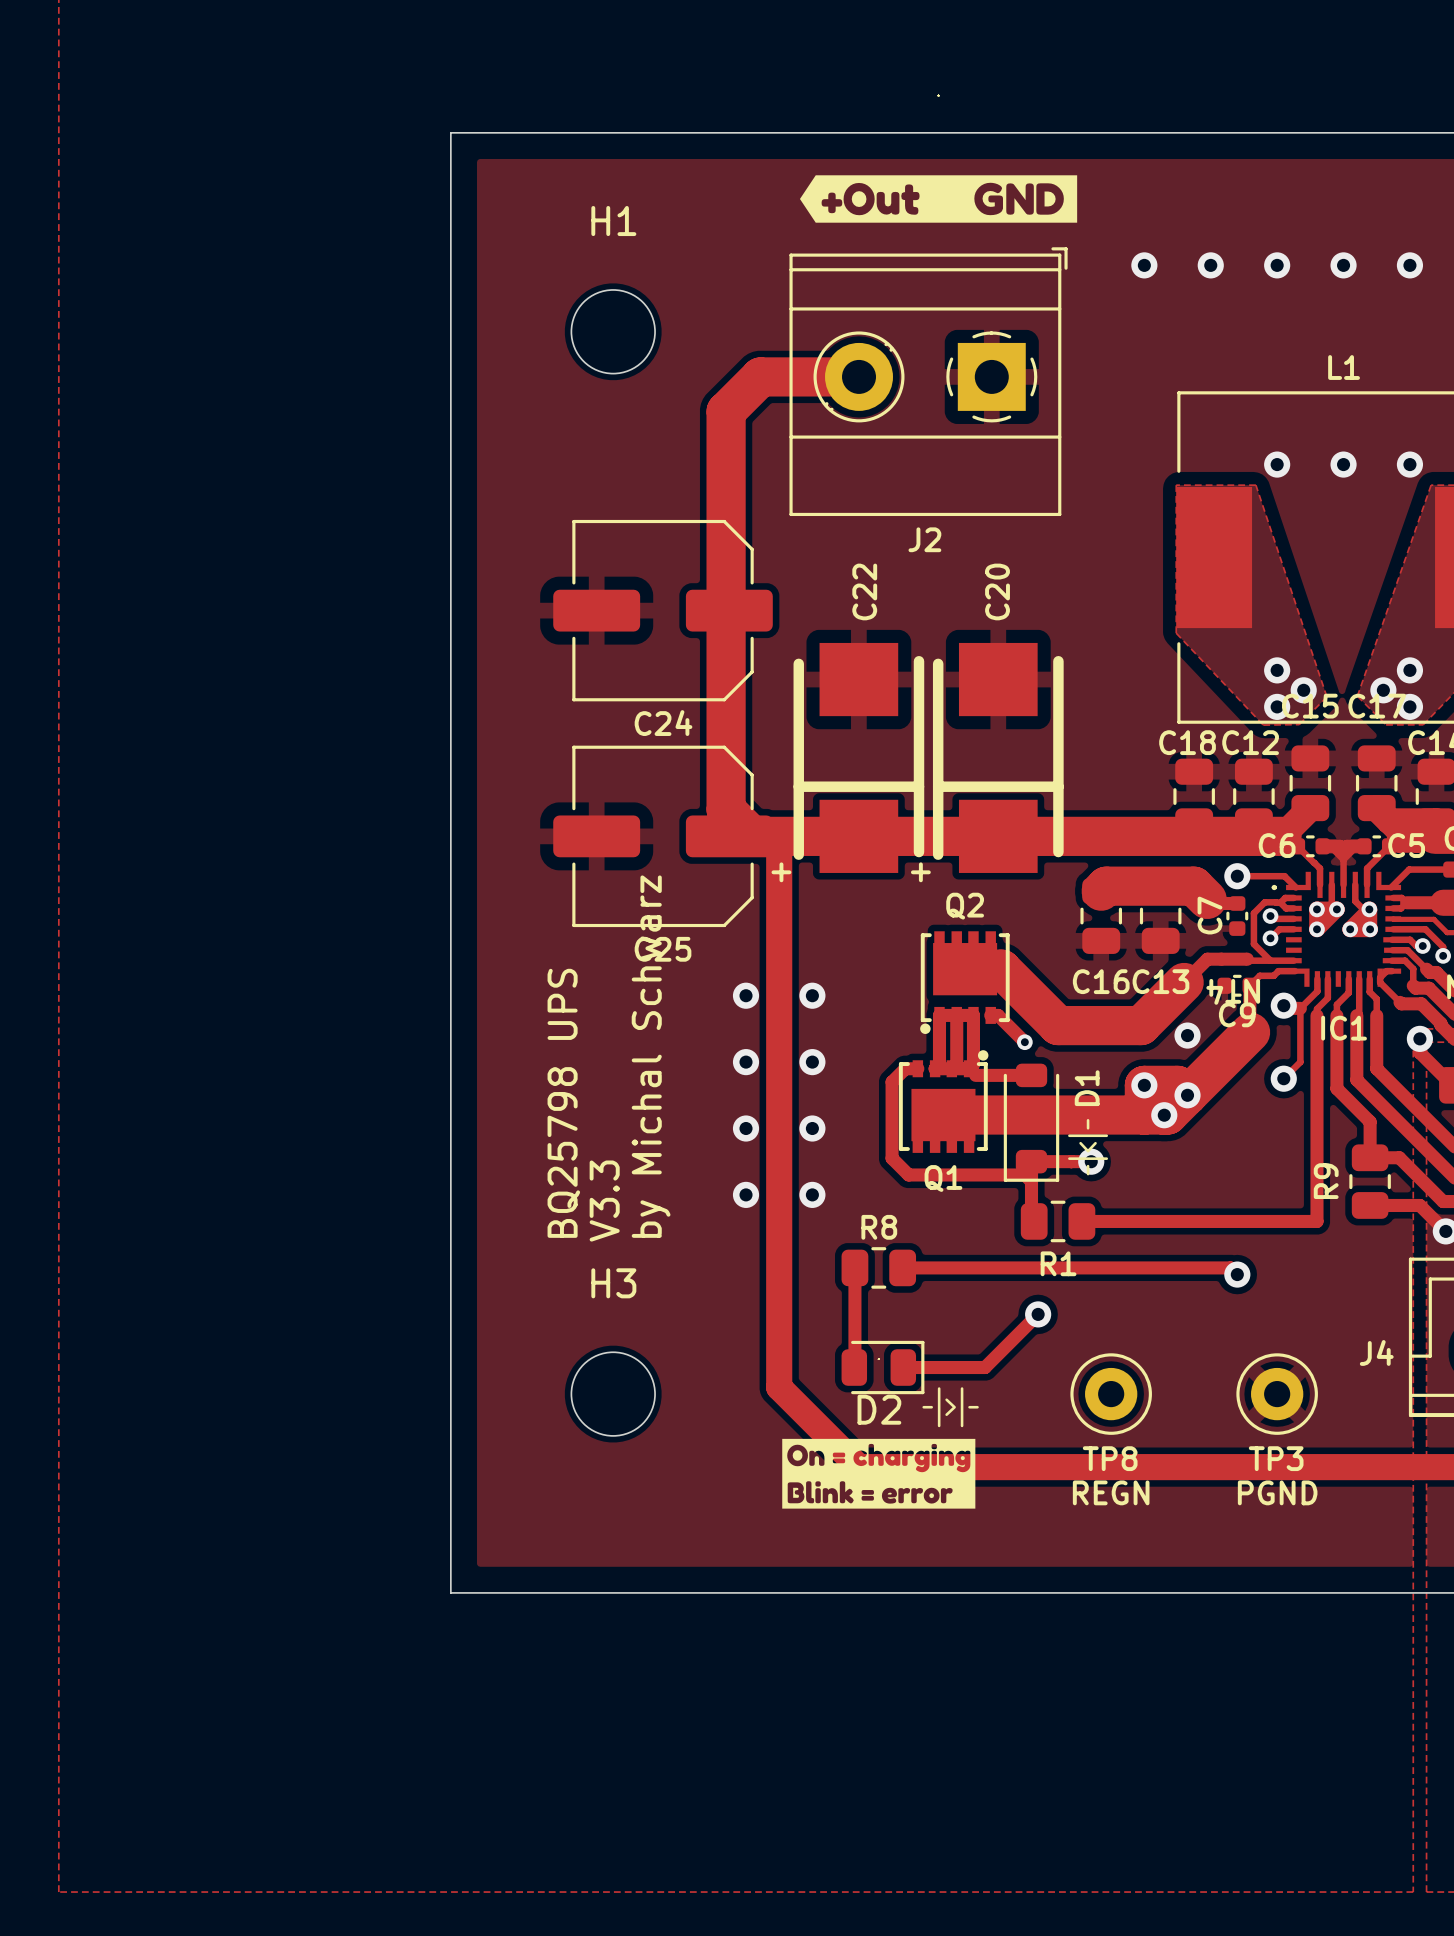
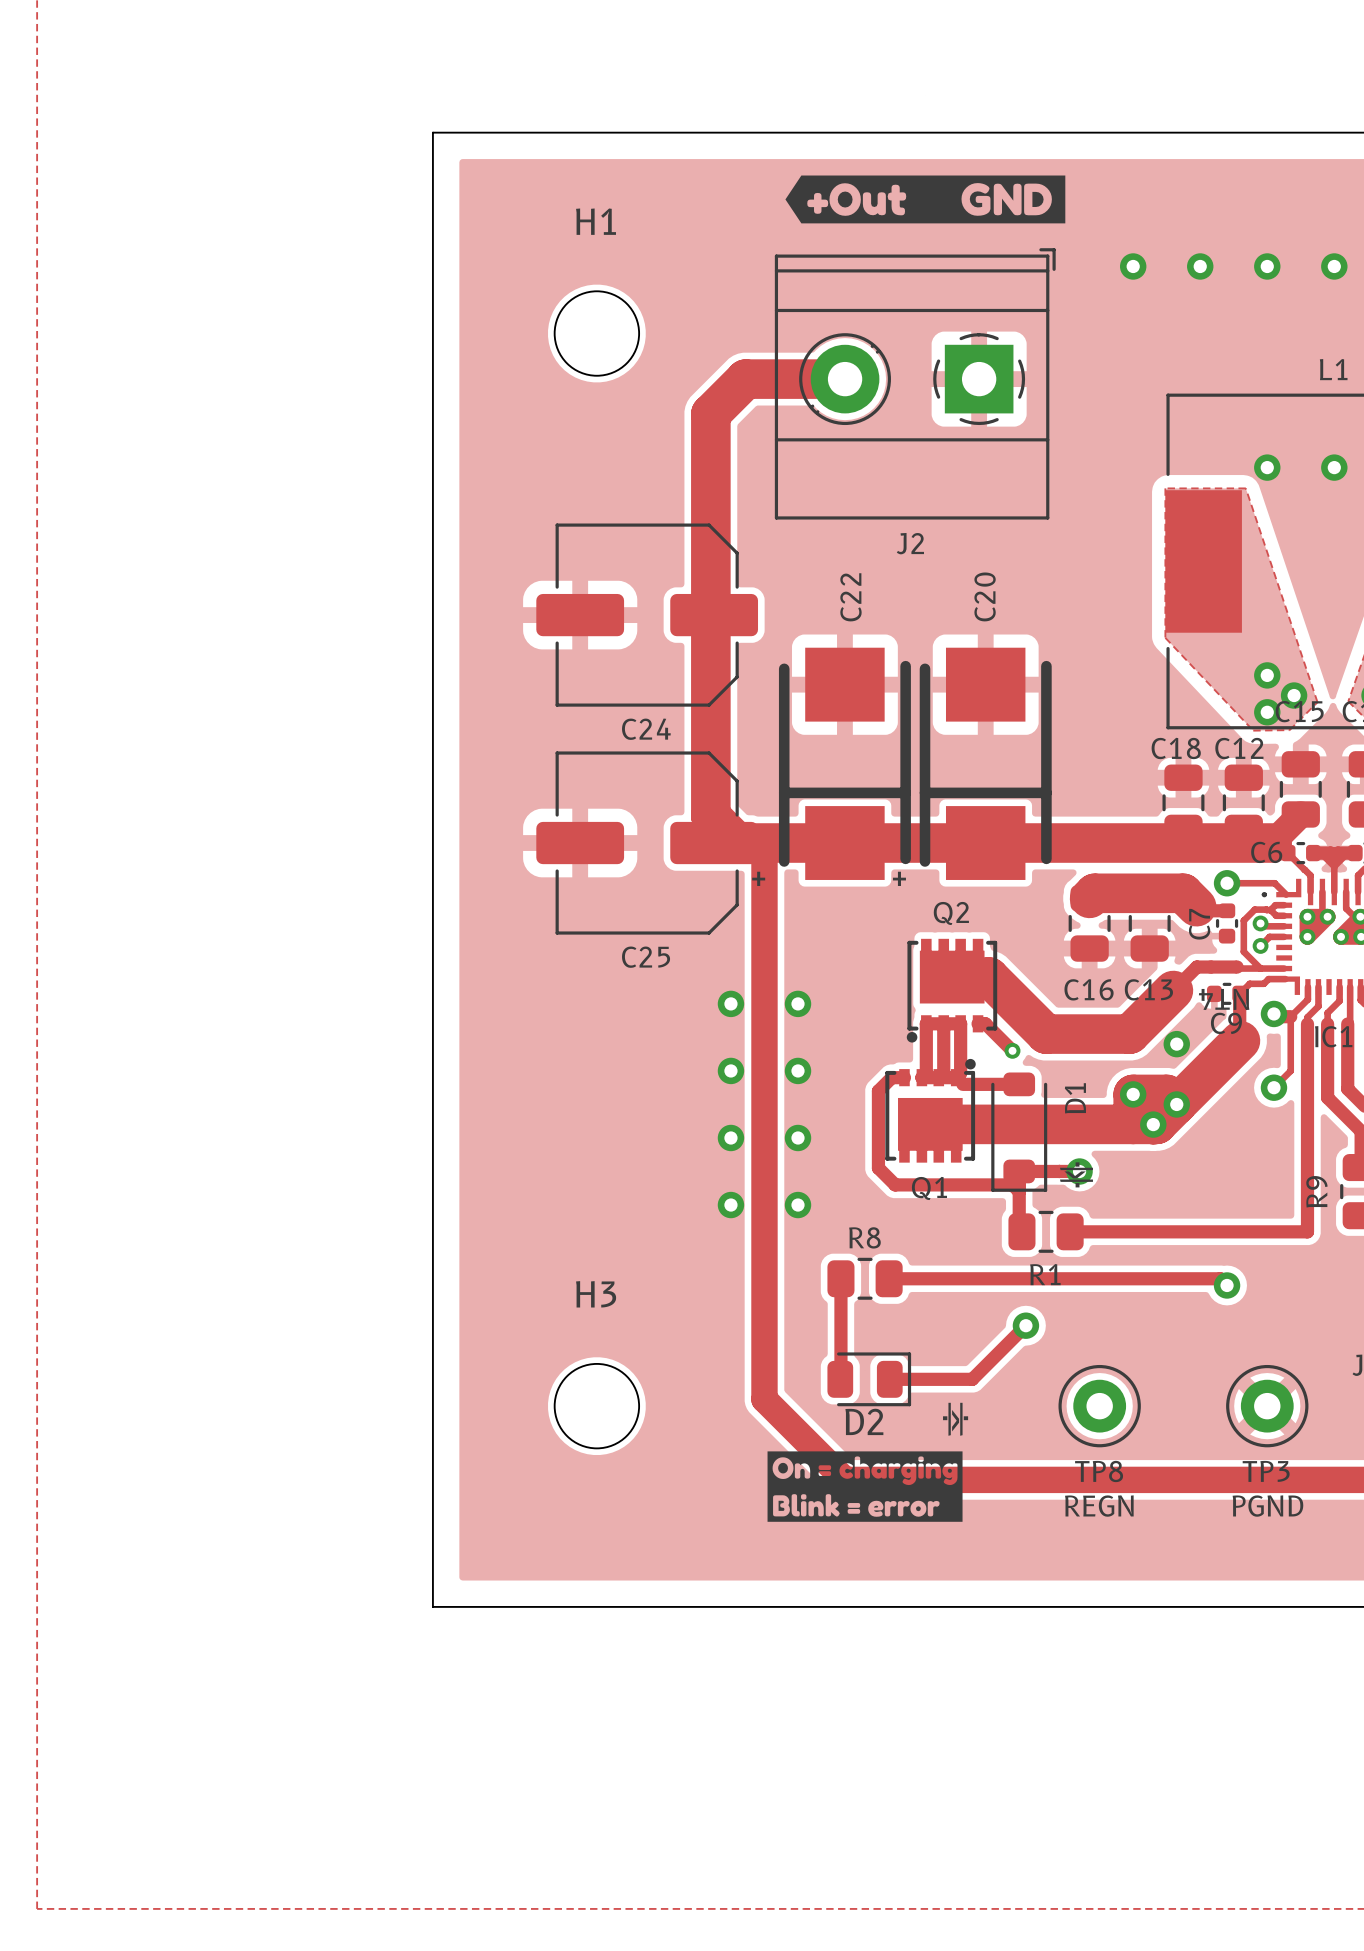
text: by Michal Schwarz (651, 1056) -> none
text: BQ25798 UPS (563, 1103) -> none
text: V3.3 (604, 1201) -> none

